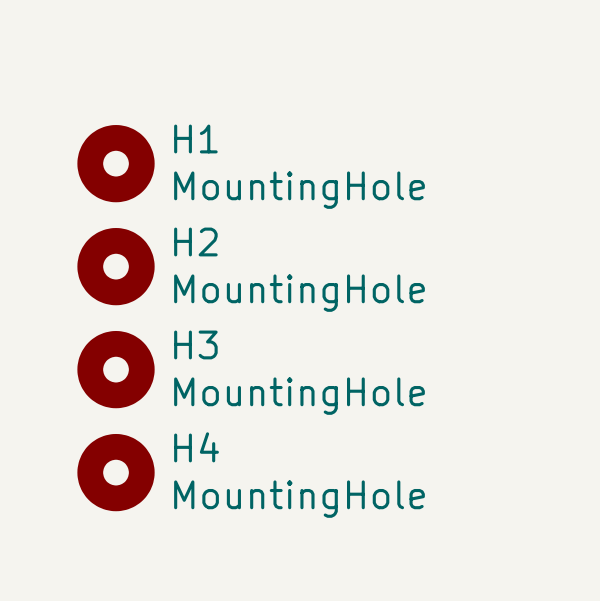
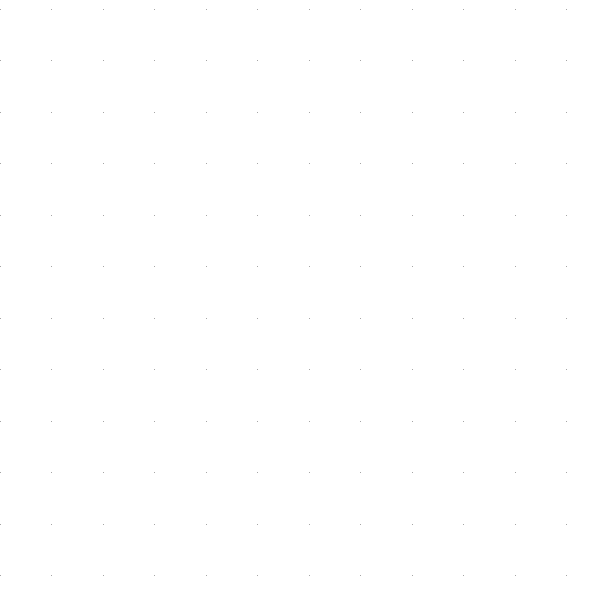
H1: MountingHole (116, 163) -> none
H2: MountingHole (116, 266) -> none
H3: MountingHole (116, 369) -> none
H4: MountingHole (116, 472) -> none

